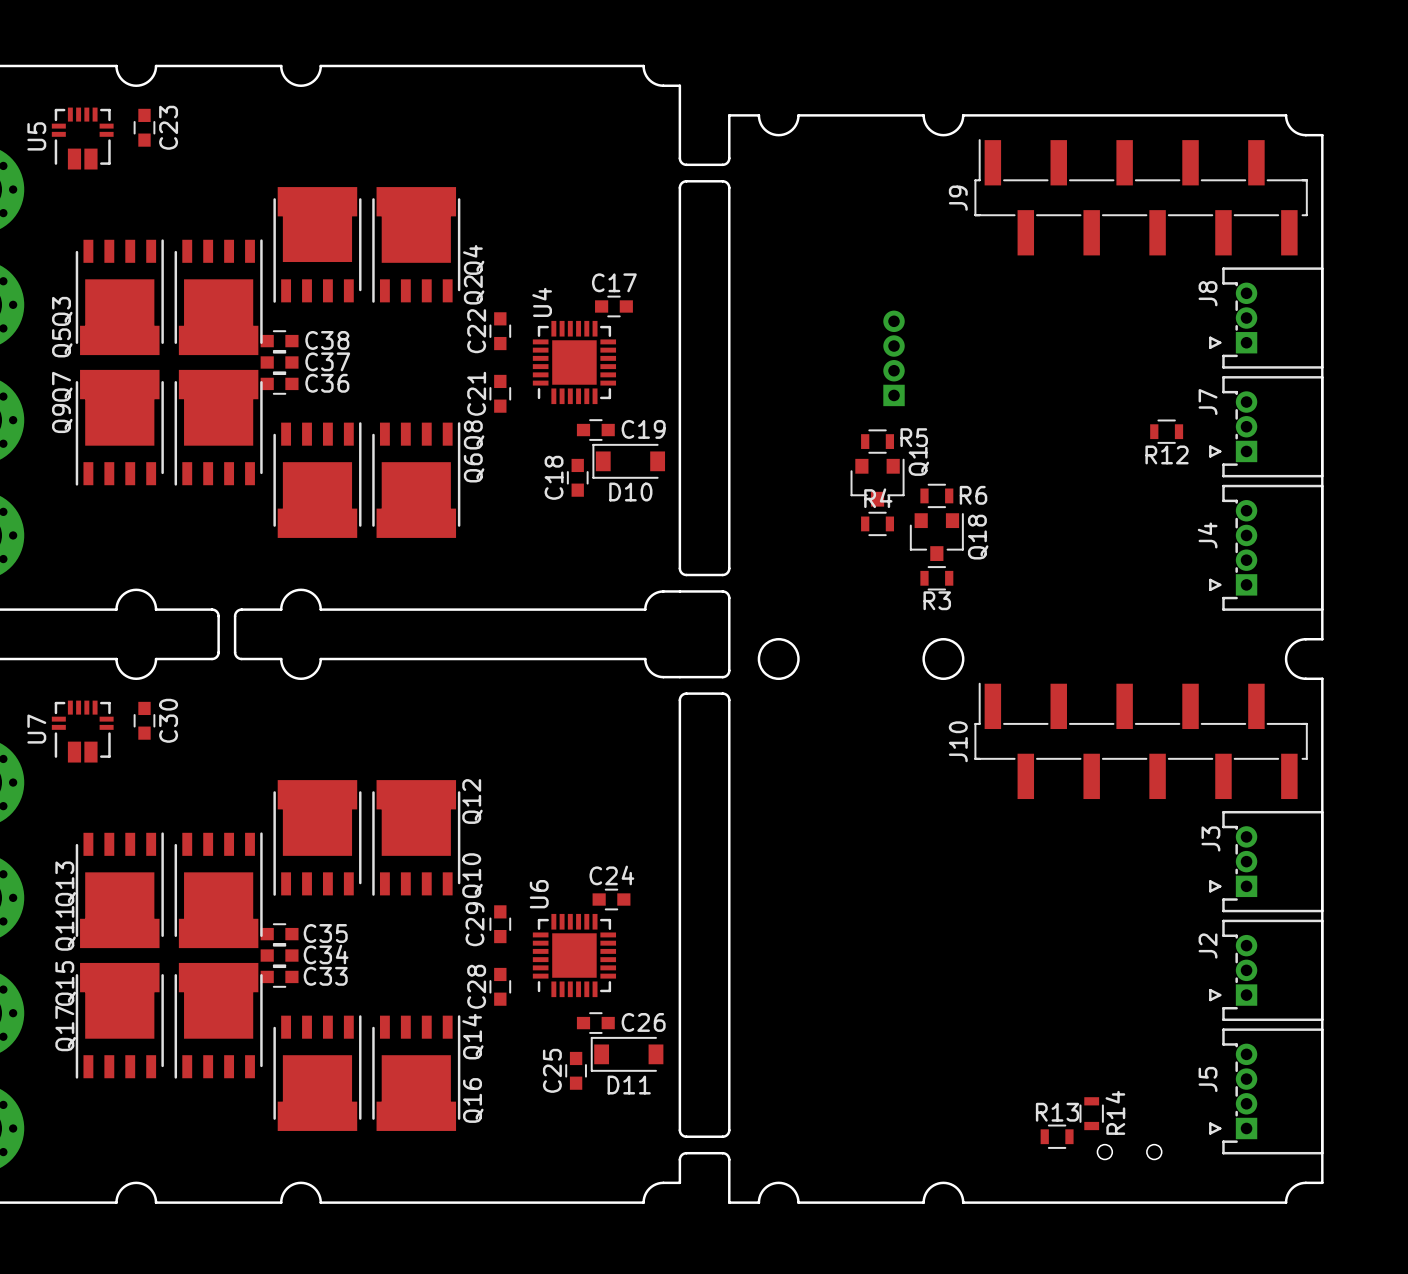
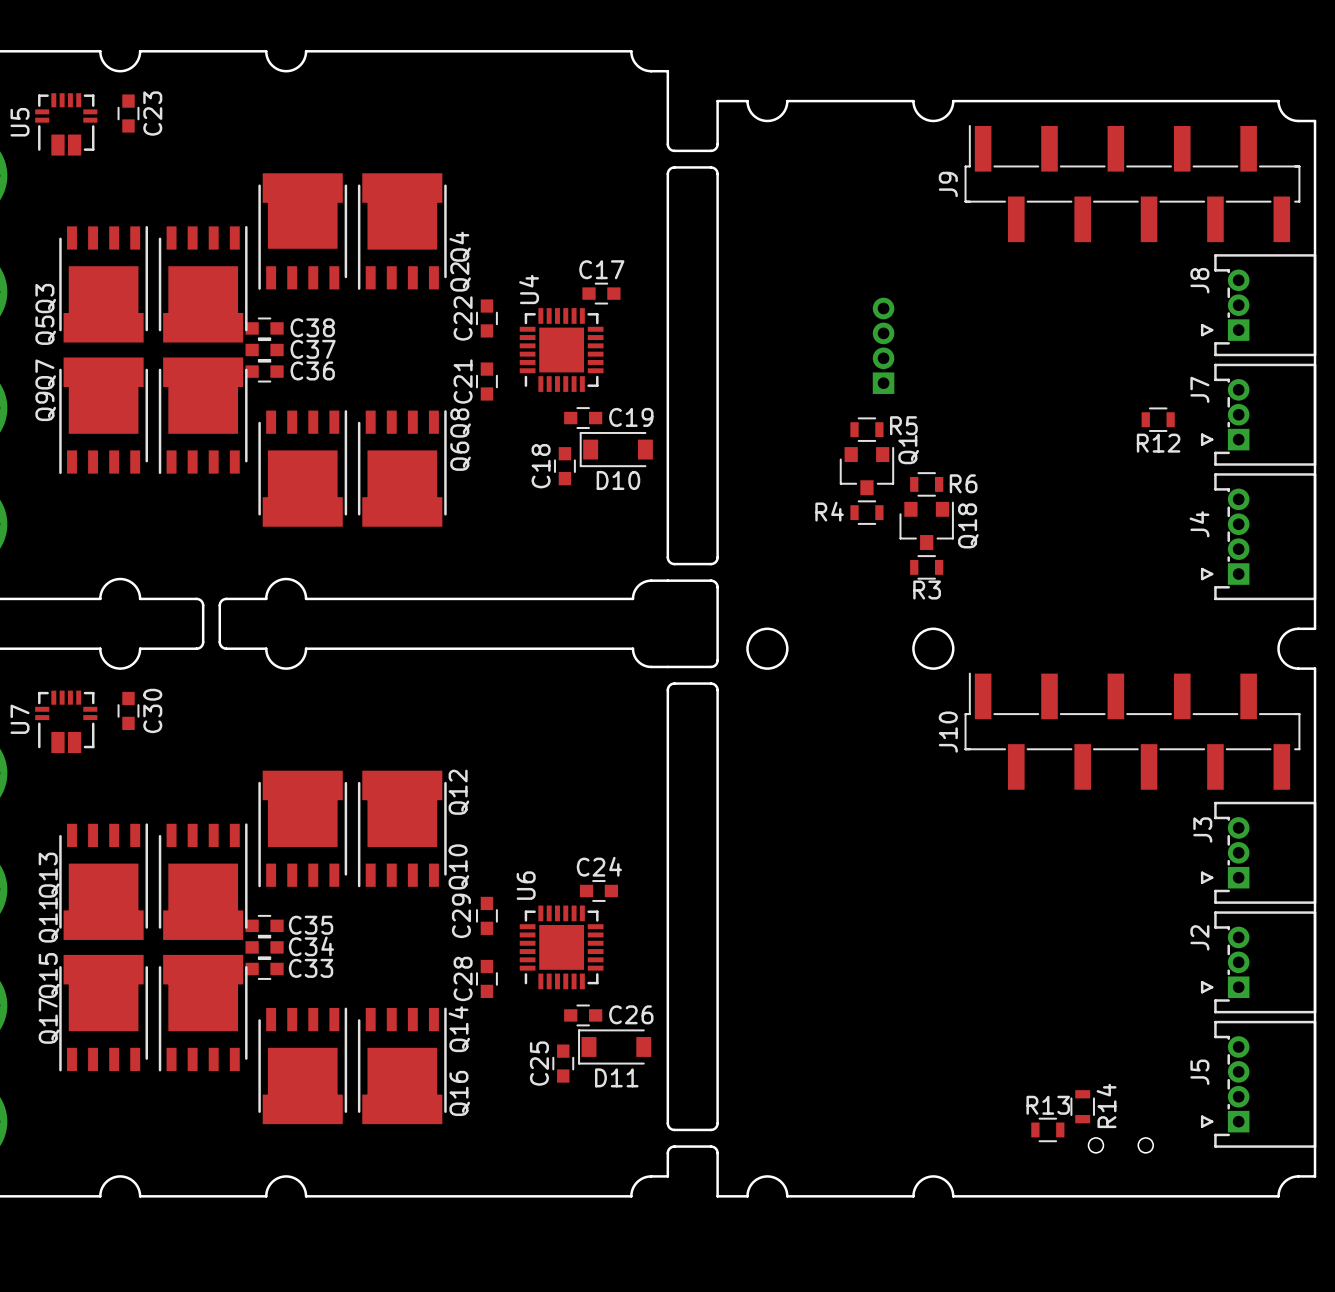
R4 name position: R4 (878, 498) -> R4 (829, 511)

